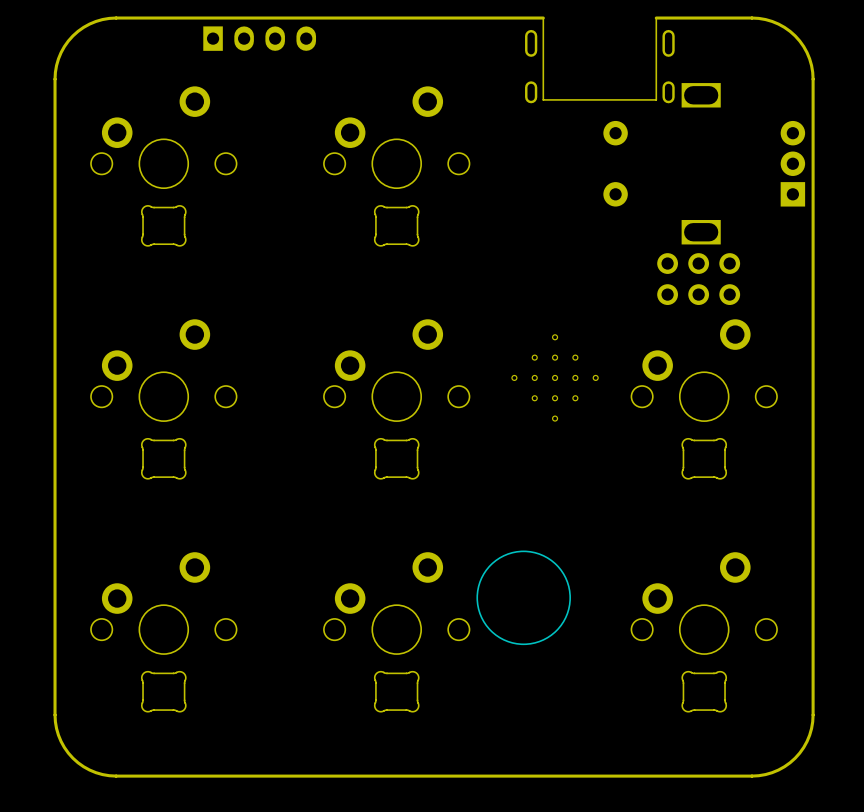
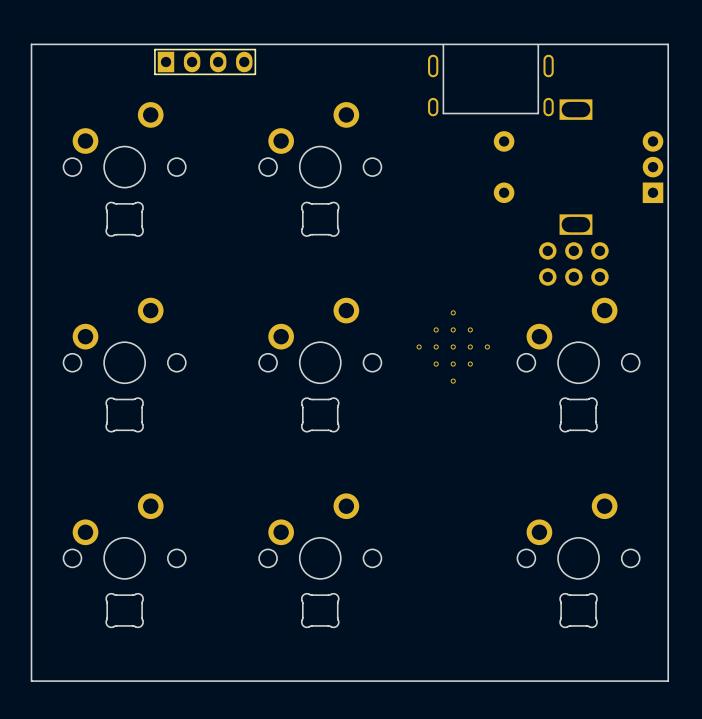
board edge: none -> (31, 44) (668, 44) (668, 681) (31, 681) (31, 44)
board edge: (543, 18) (109, 18) (95, 21) (83, 27) (72, 35) (64, 46) (58, 58) (55, 79) (55, 714) (58, 735) (64, 747) (72, 758) (83, 766) (102, 774) (116, 776) (751, 776) (765, 774) (778, 770) (790, 762) (799, 753) (809, 735) (813, 714) (813, 79) (811, 65) (807, 52) (795, 35) (784, 27) (772, 21) (751, 18) (656, 18) -> none
part footprint: [203, 26, 317, 51] -> [154, 48, 256, 75]
drawing: [476, 550, 571, 645] -> none

